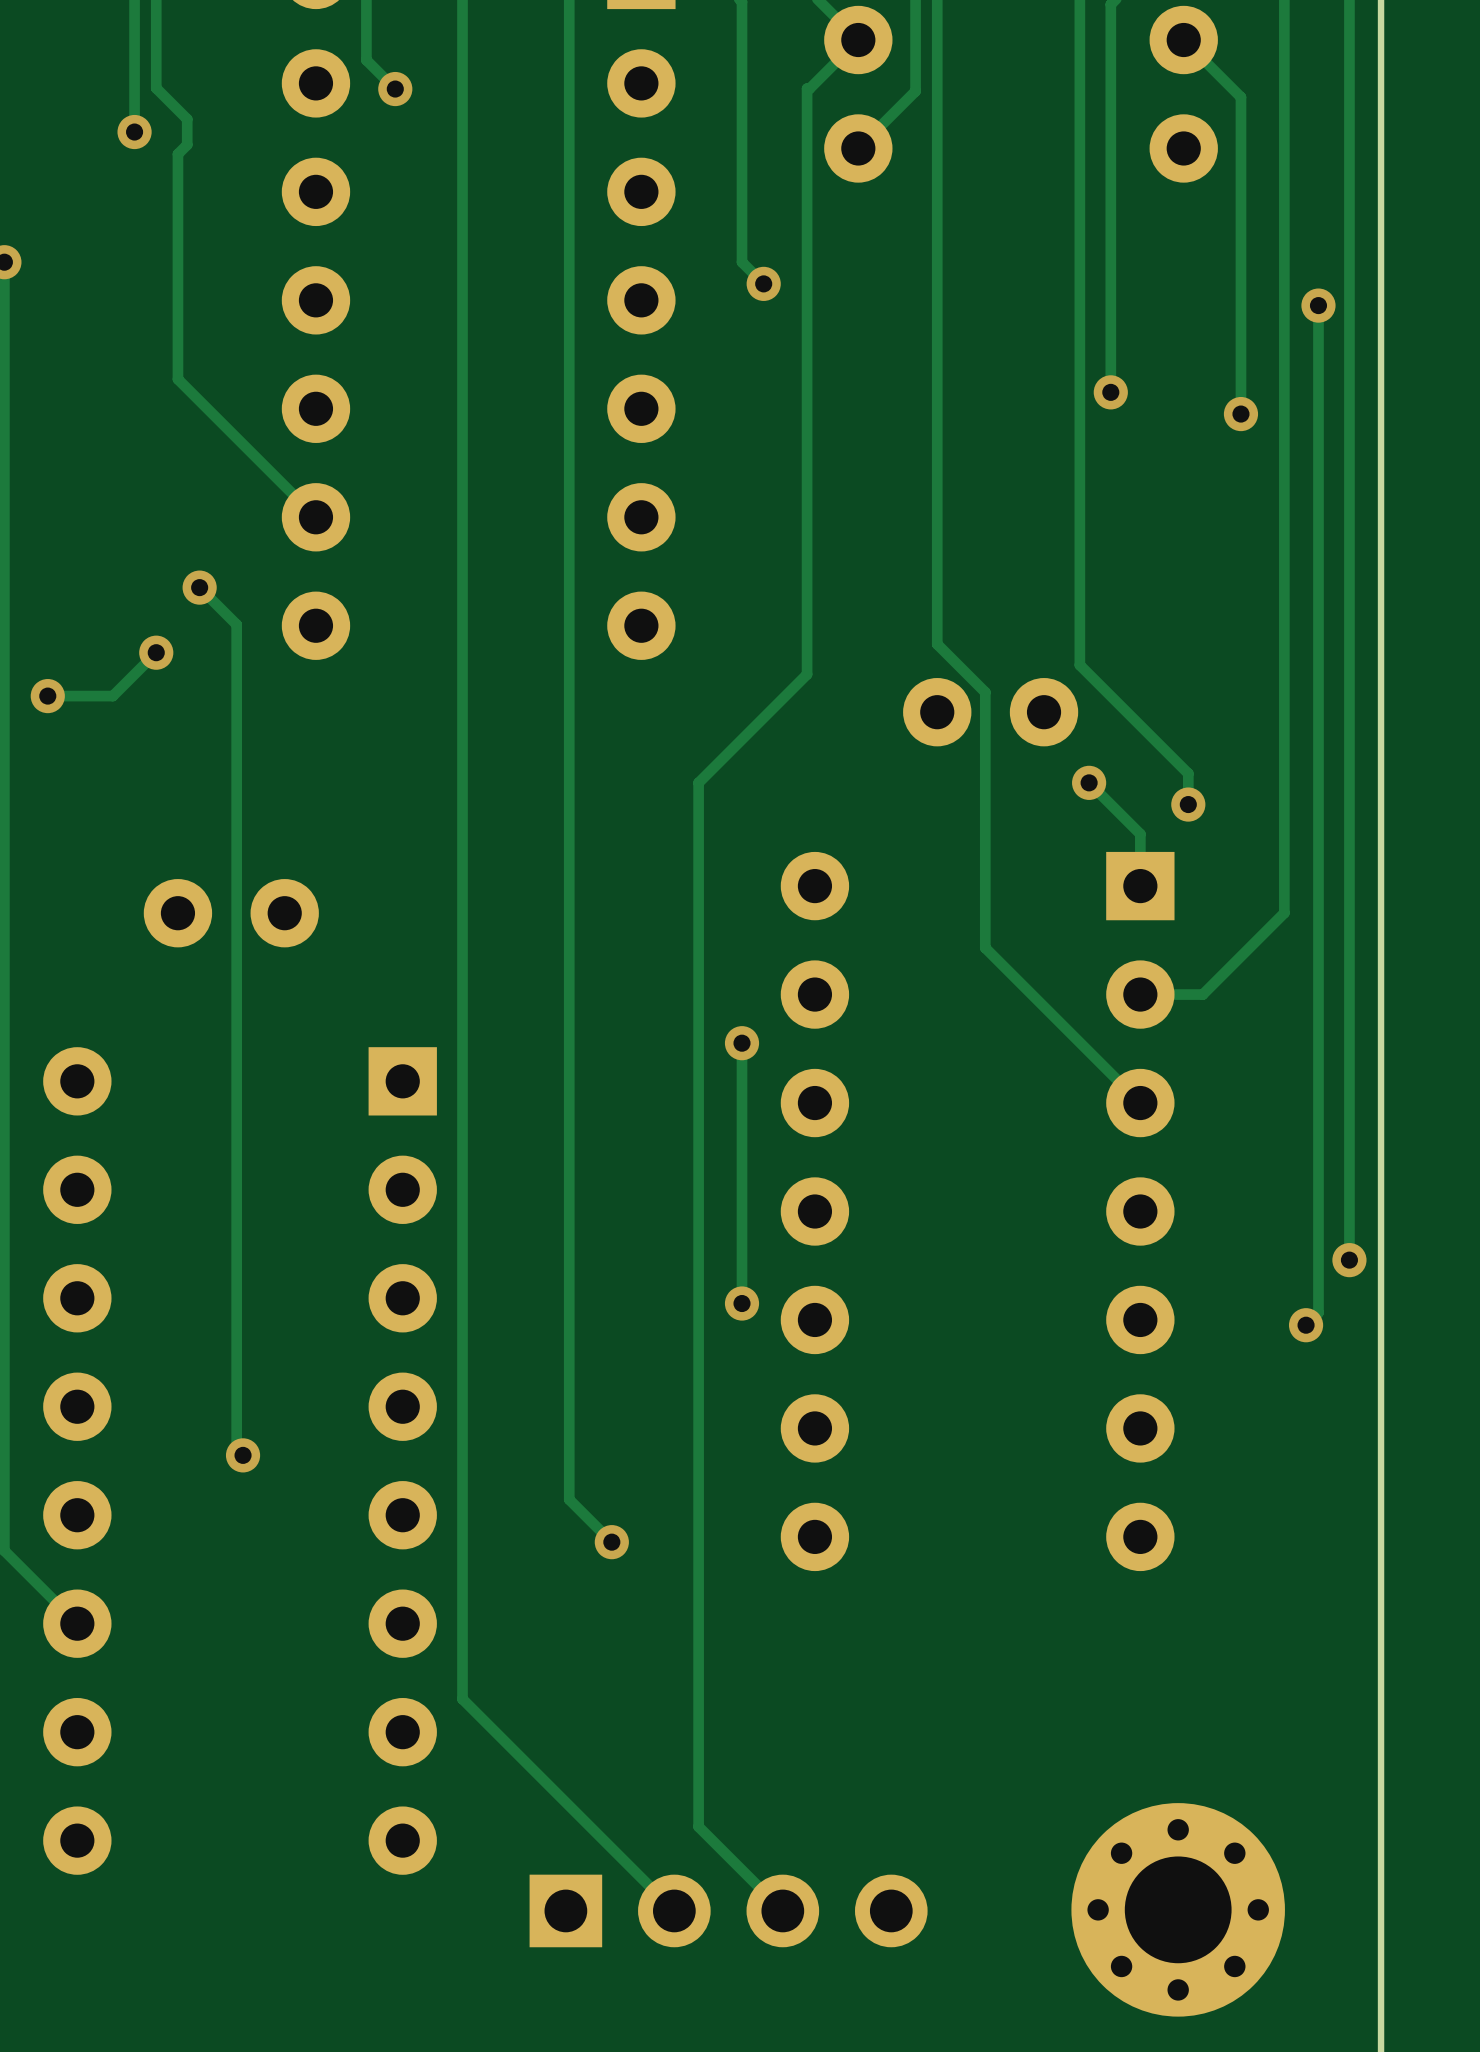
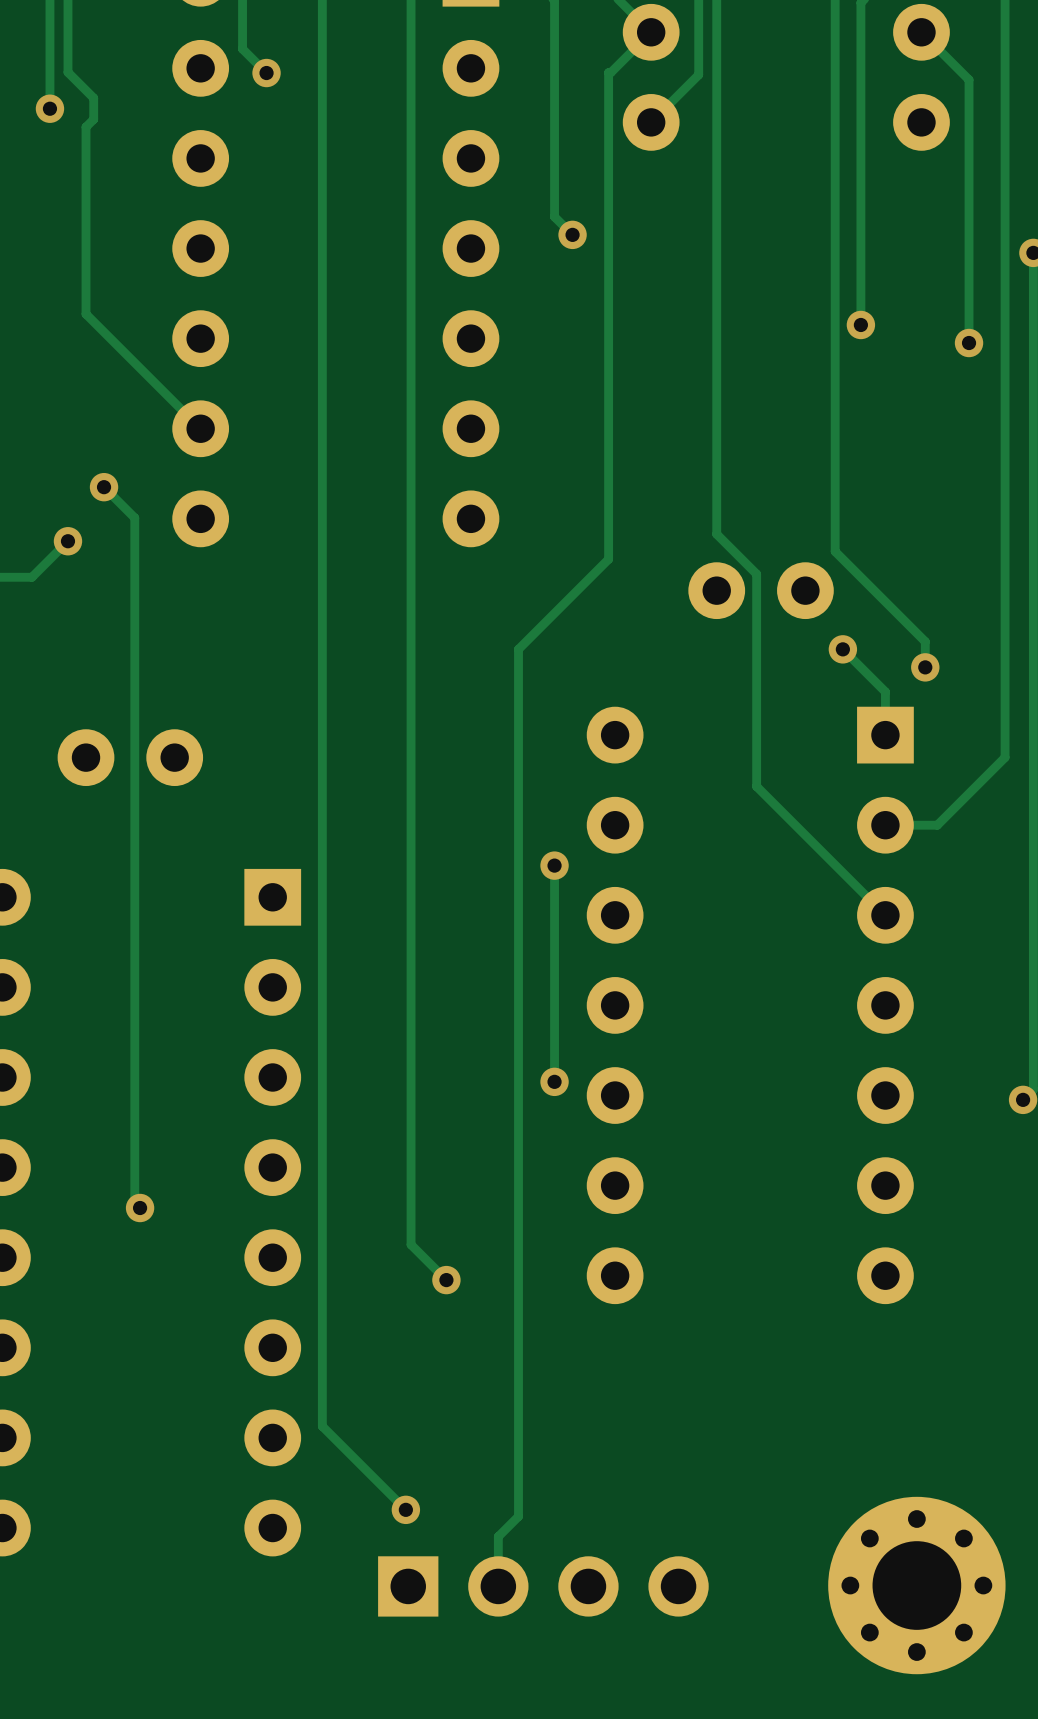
track: (462, 1699) (674, 1910) -> (322, 1410) (322, 1426) (405, 1509)
via: none -> (405, 1509)
track: (698, 1826) (782, 1910) -> (518, 1516) (498, 1536) (498, 1586)

